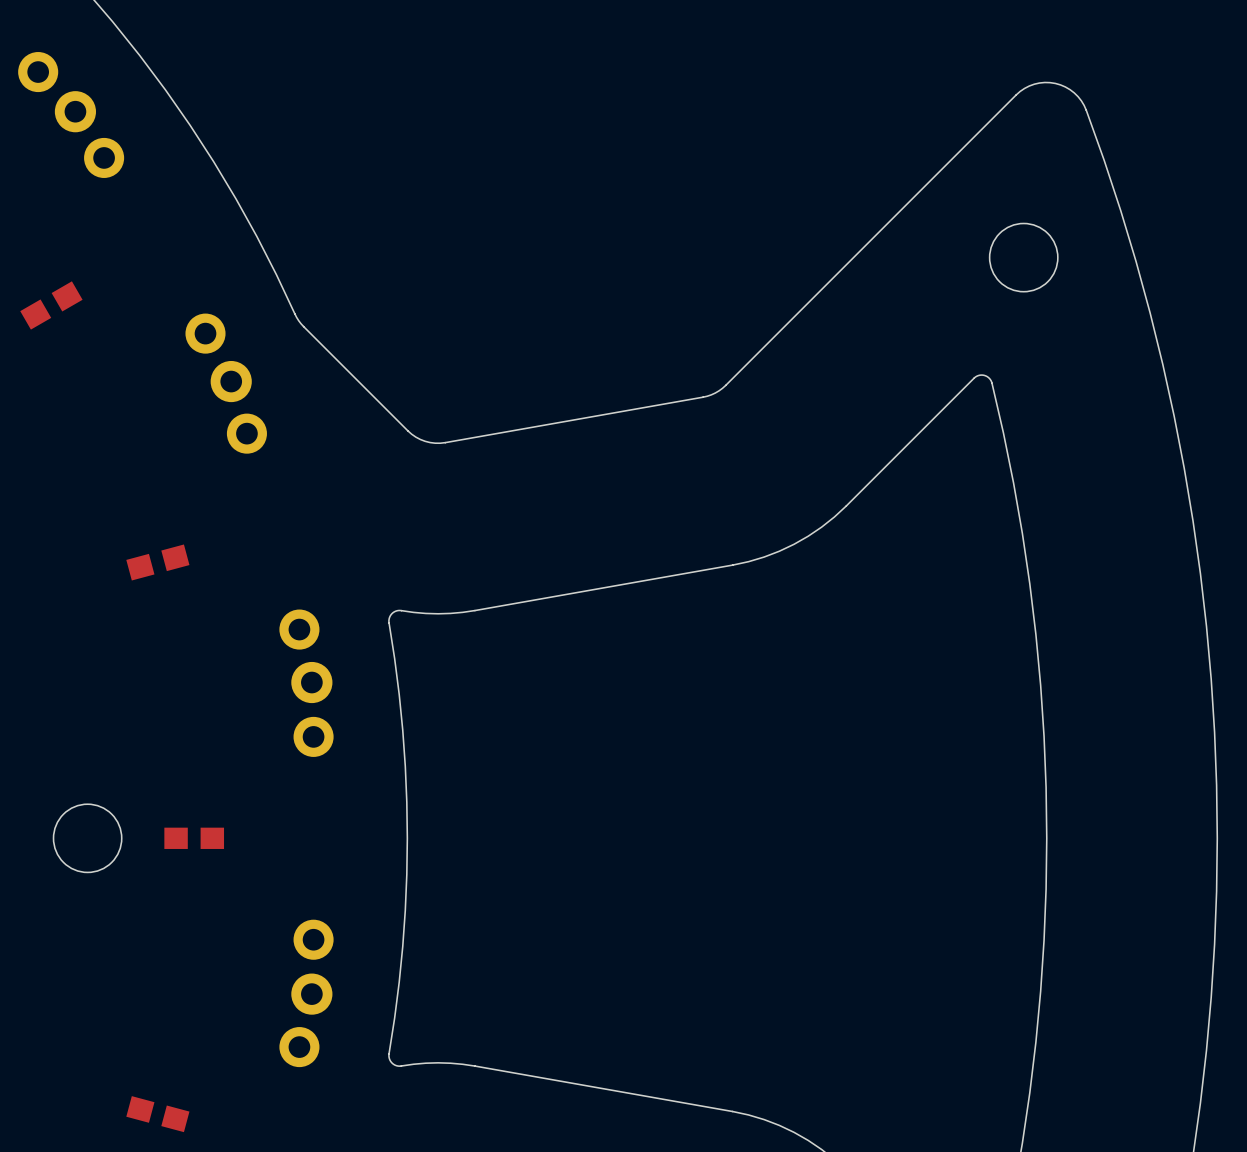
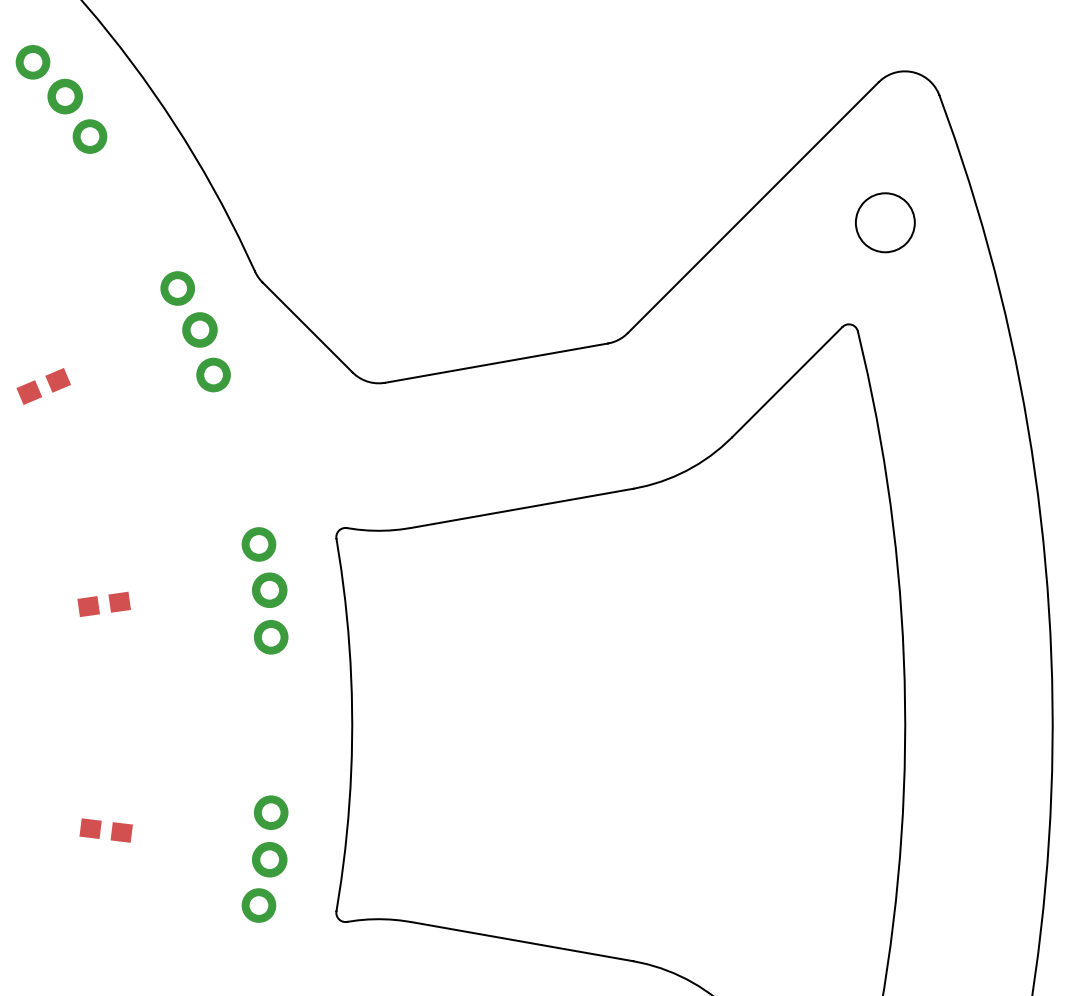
part: (51, 305) -> none
part: none -> (43, 386)
part: (157, 562) -> none
part: none -> (104, 604)
round board edge: [53, 804, 122, 873] -> none
part: (194, 838) -> none
part: none -> (106, 830)
part: (157, 1114) -> none

